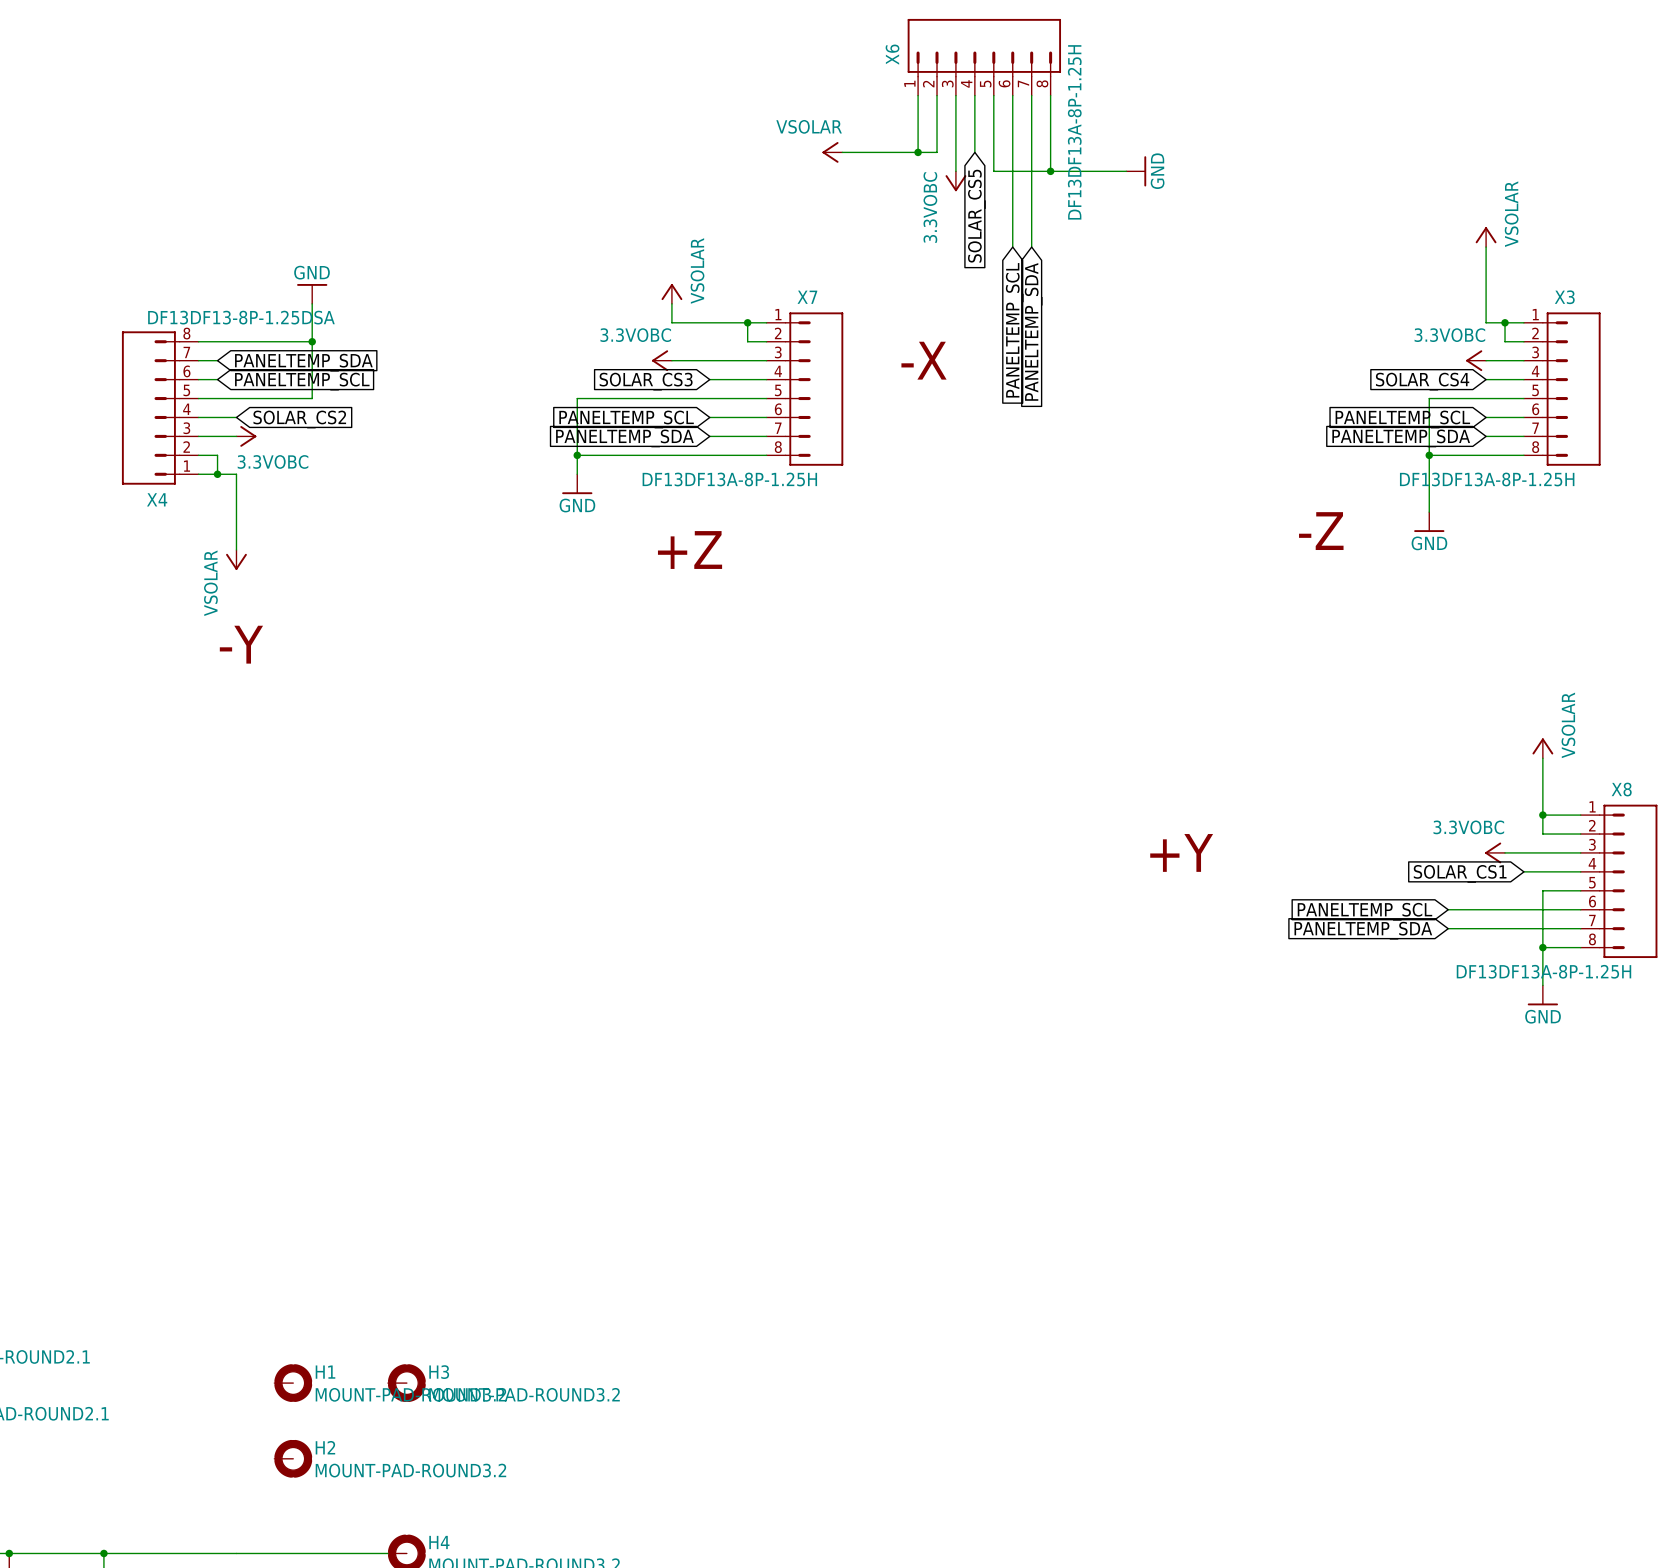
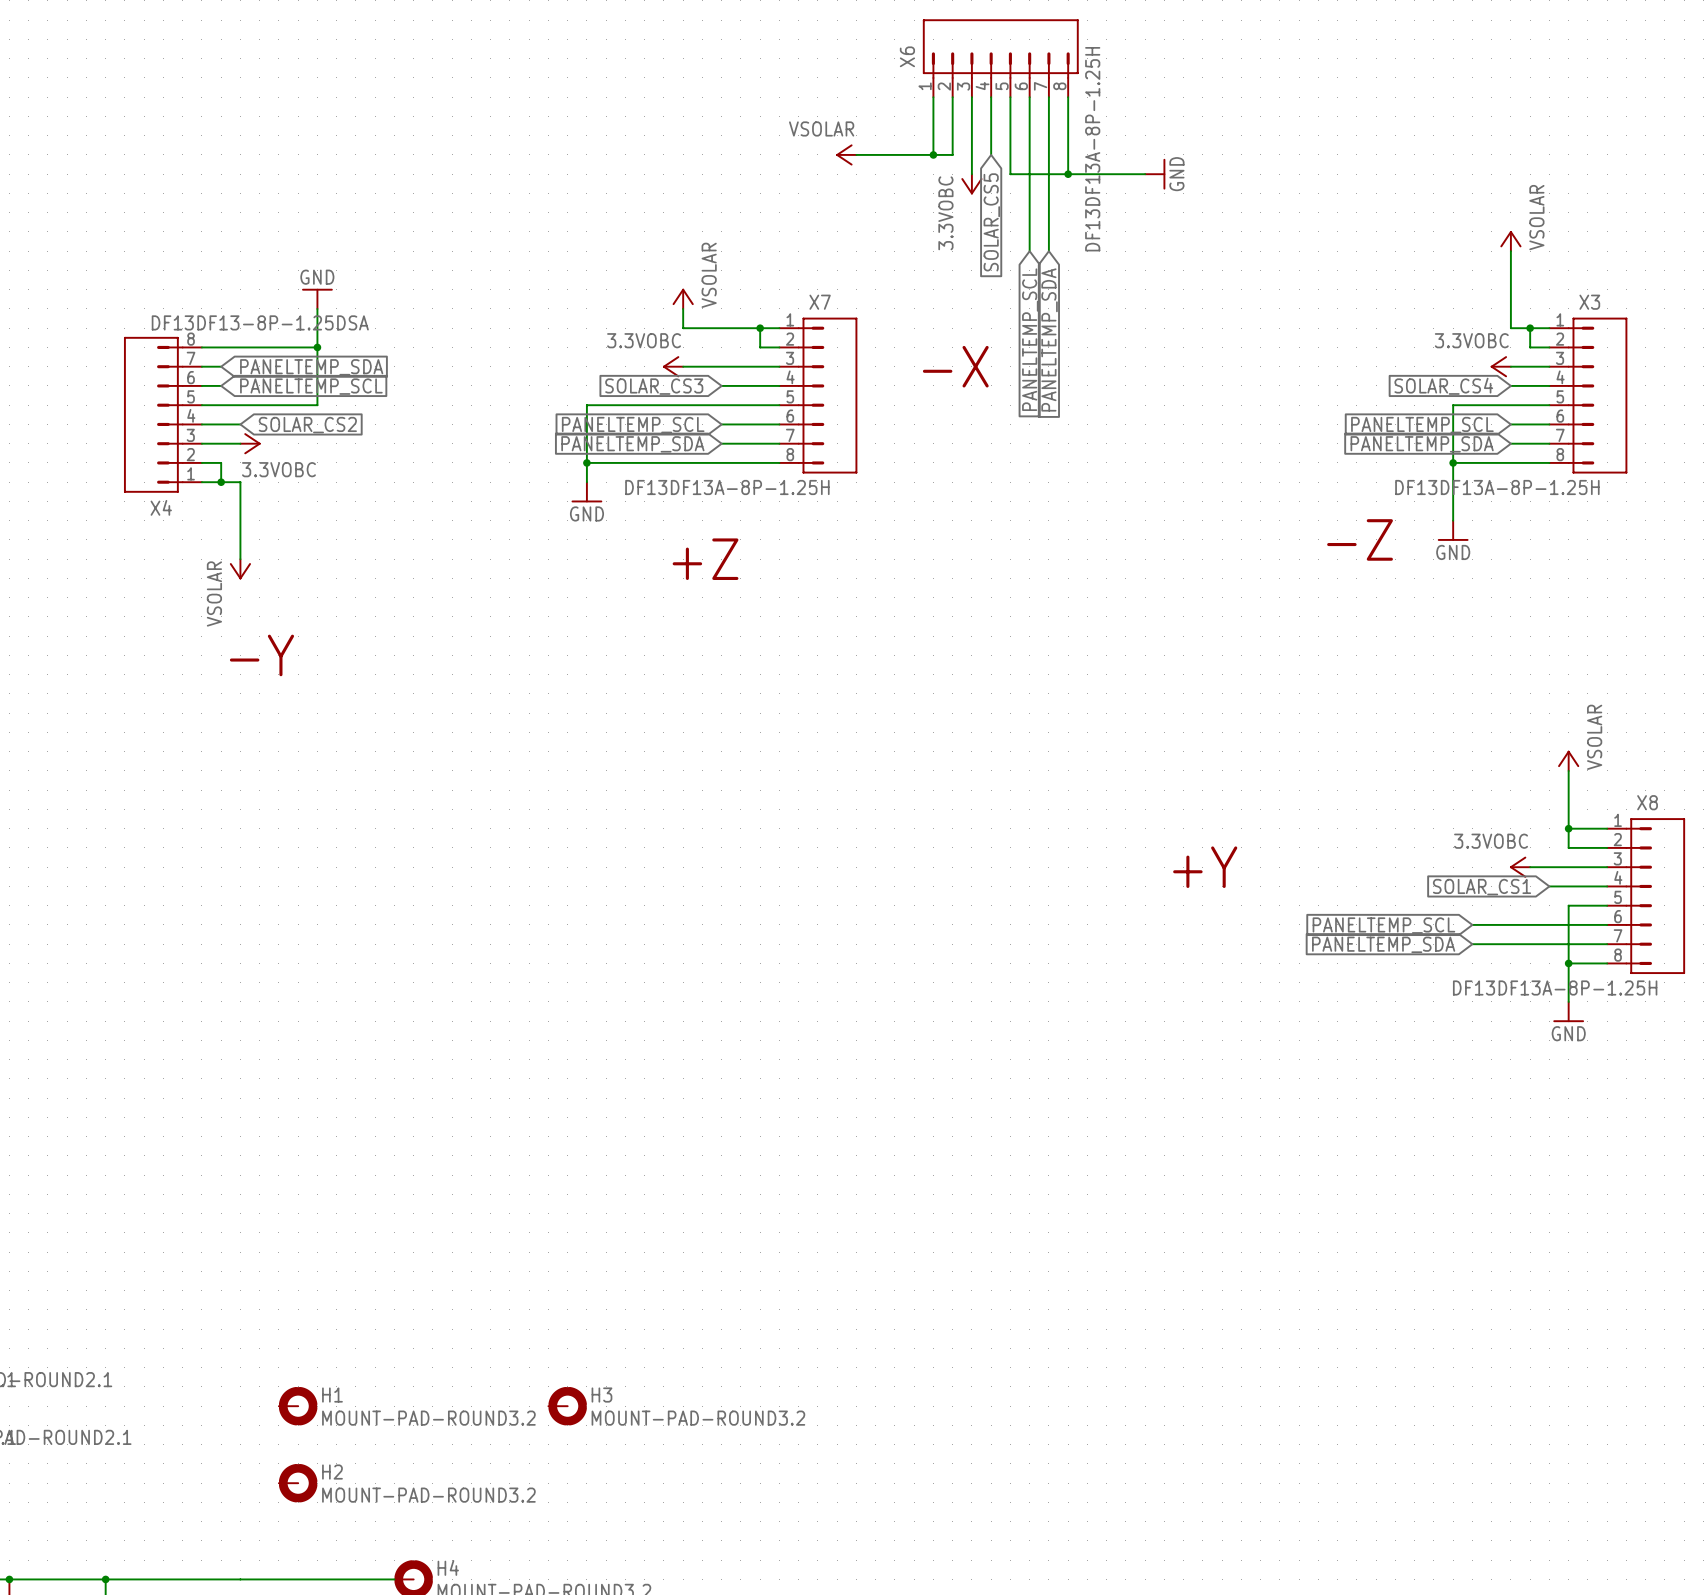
H3 position: (406, 1383) -> (567, 1406)

